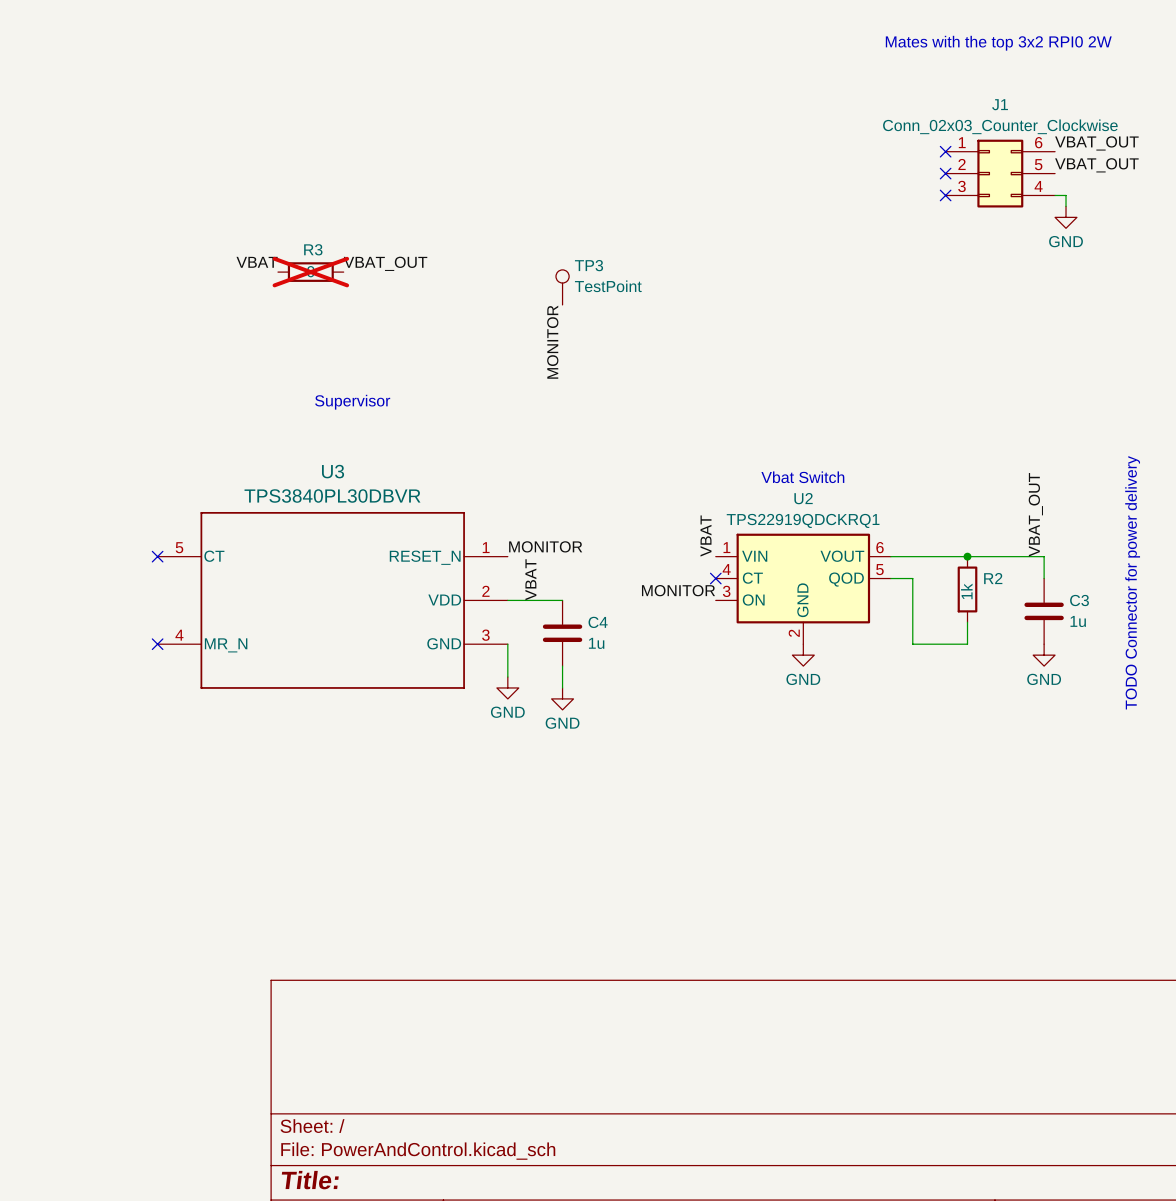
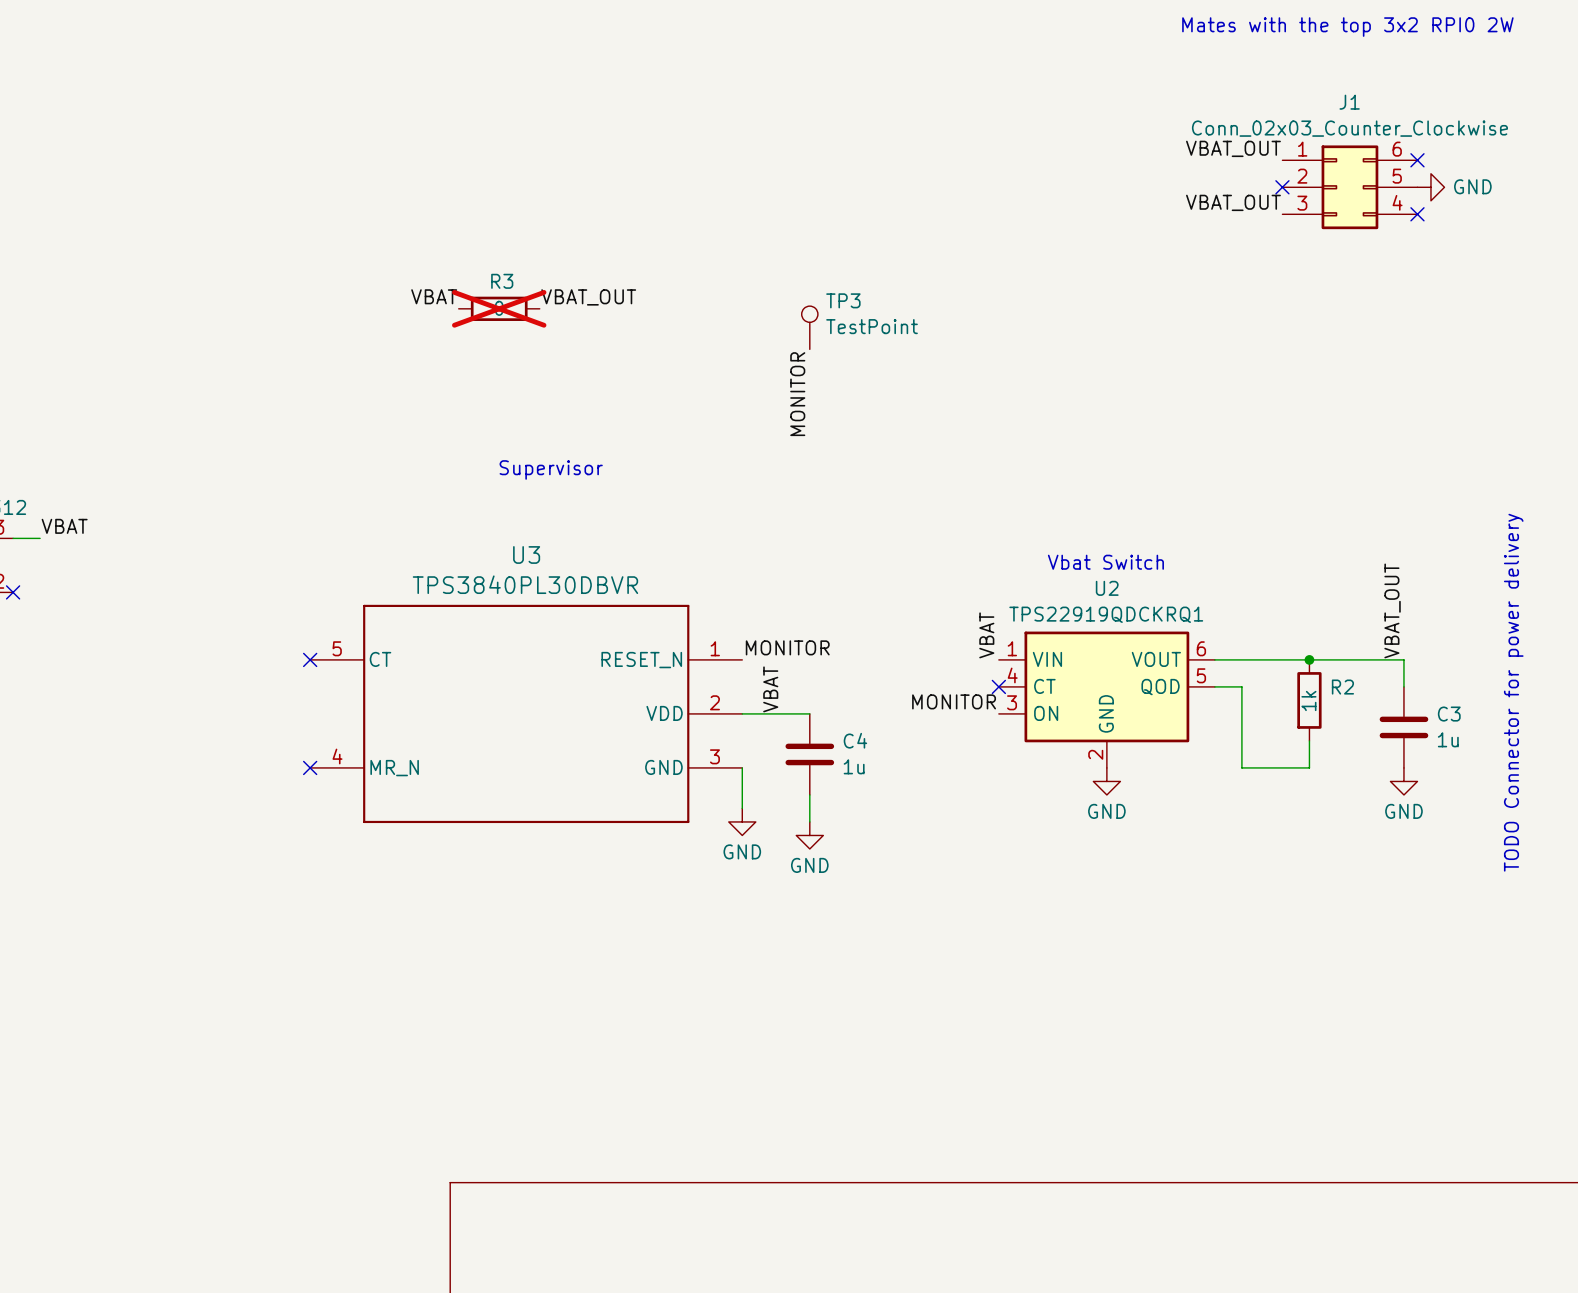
label: none -> VBAT_OUT (1233, 148)
label: VBAT_OUT (1096, 143) -> none
no-connect mark: (945, 151) -> none
no-connect mark: none -> (1417, 160)
label: VBAT_OUT (1096, 165) -> none
label: none -> VBAT_OUT (1233, 202)
no-connect mark: (945, 195) -> none
wire: (1055, 195) (1066, 195) (1066, 206) -> none
no-connect mark: none -> (1417, 214)
power symbol rotation: 0° (1066, 217) -> 90° counterclockwise (1430, 187)
power symbol position: GND (1066, 217) -> GND (1430, 187)

